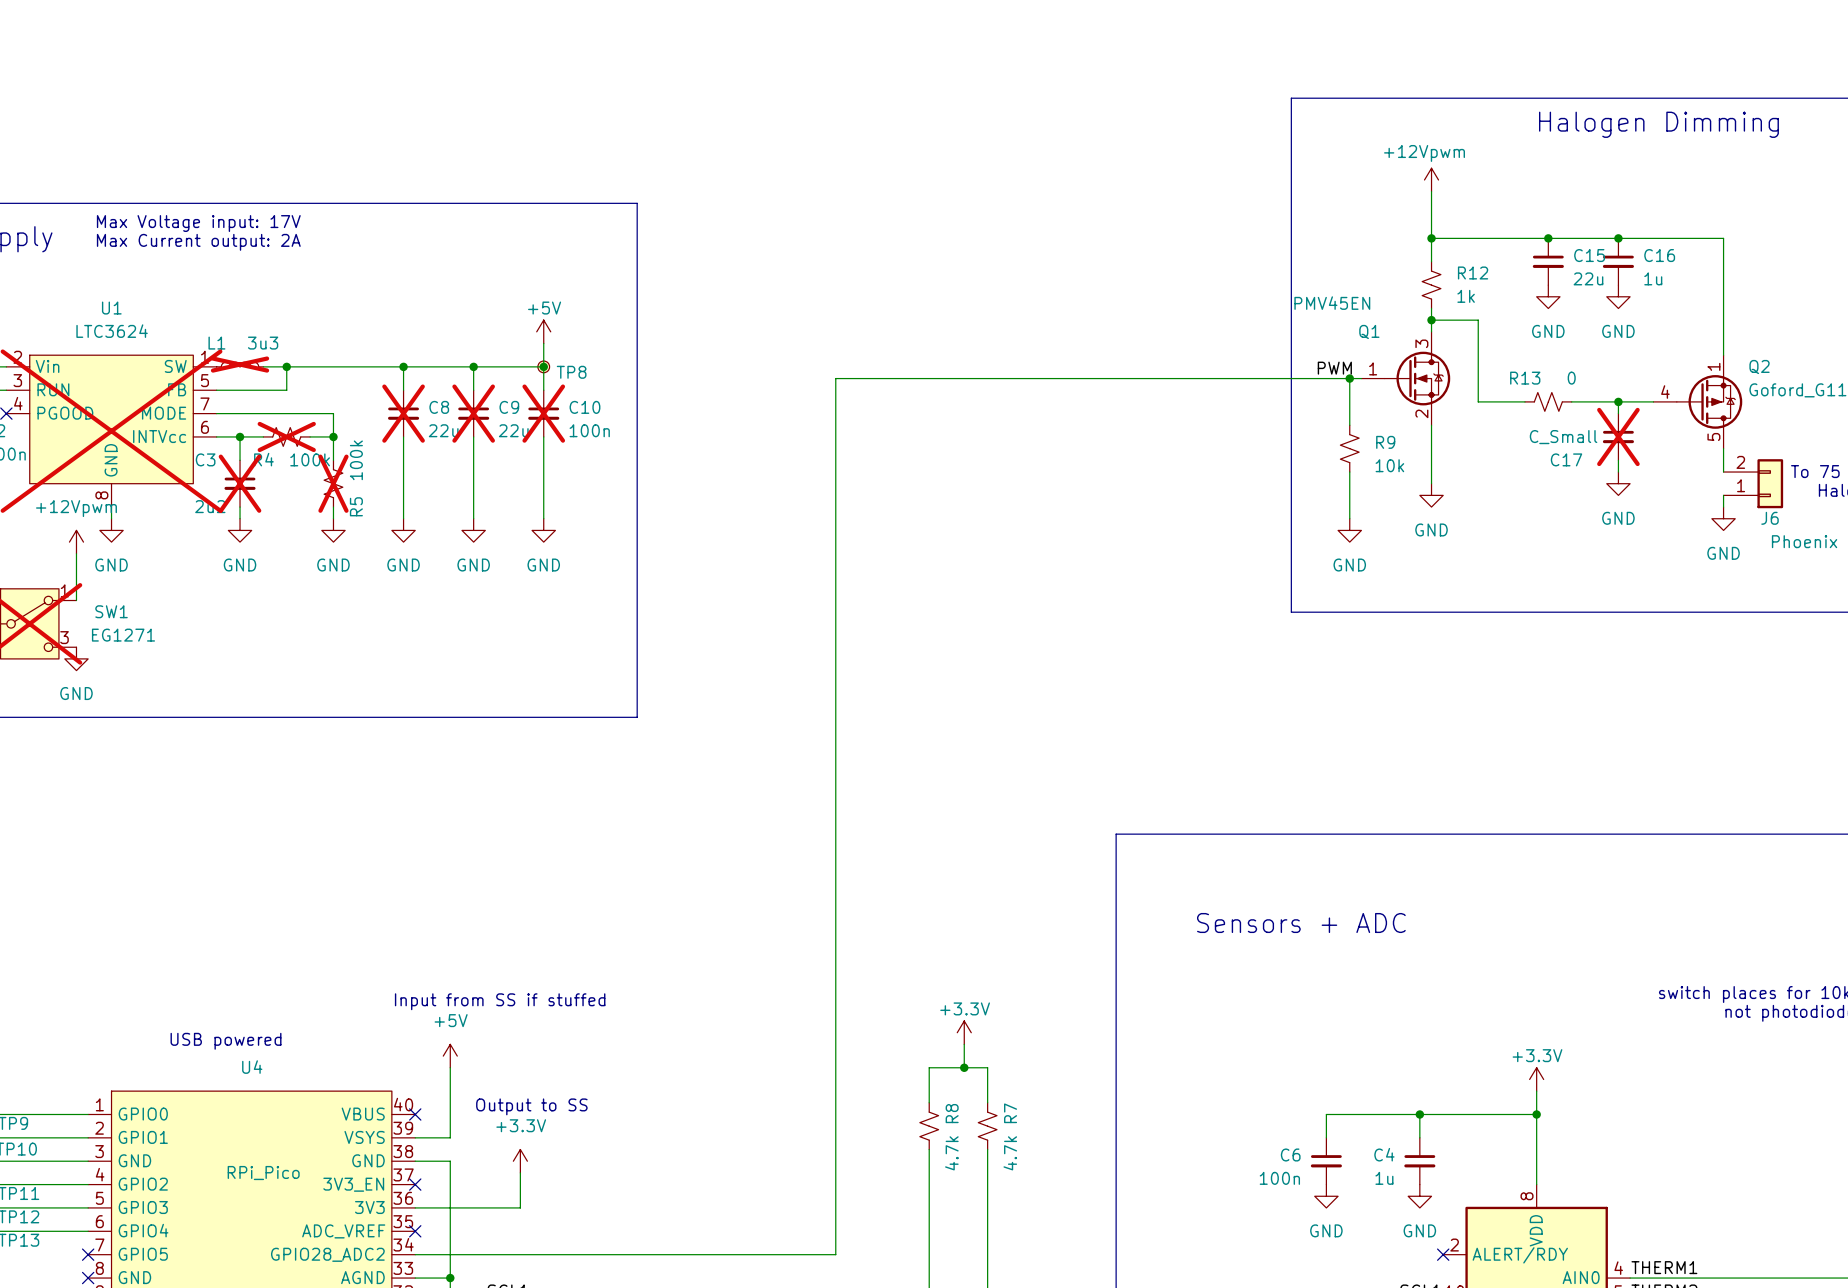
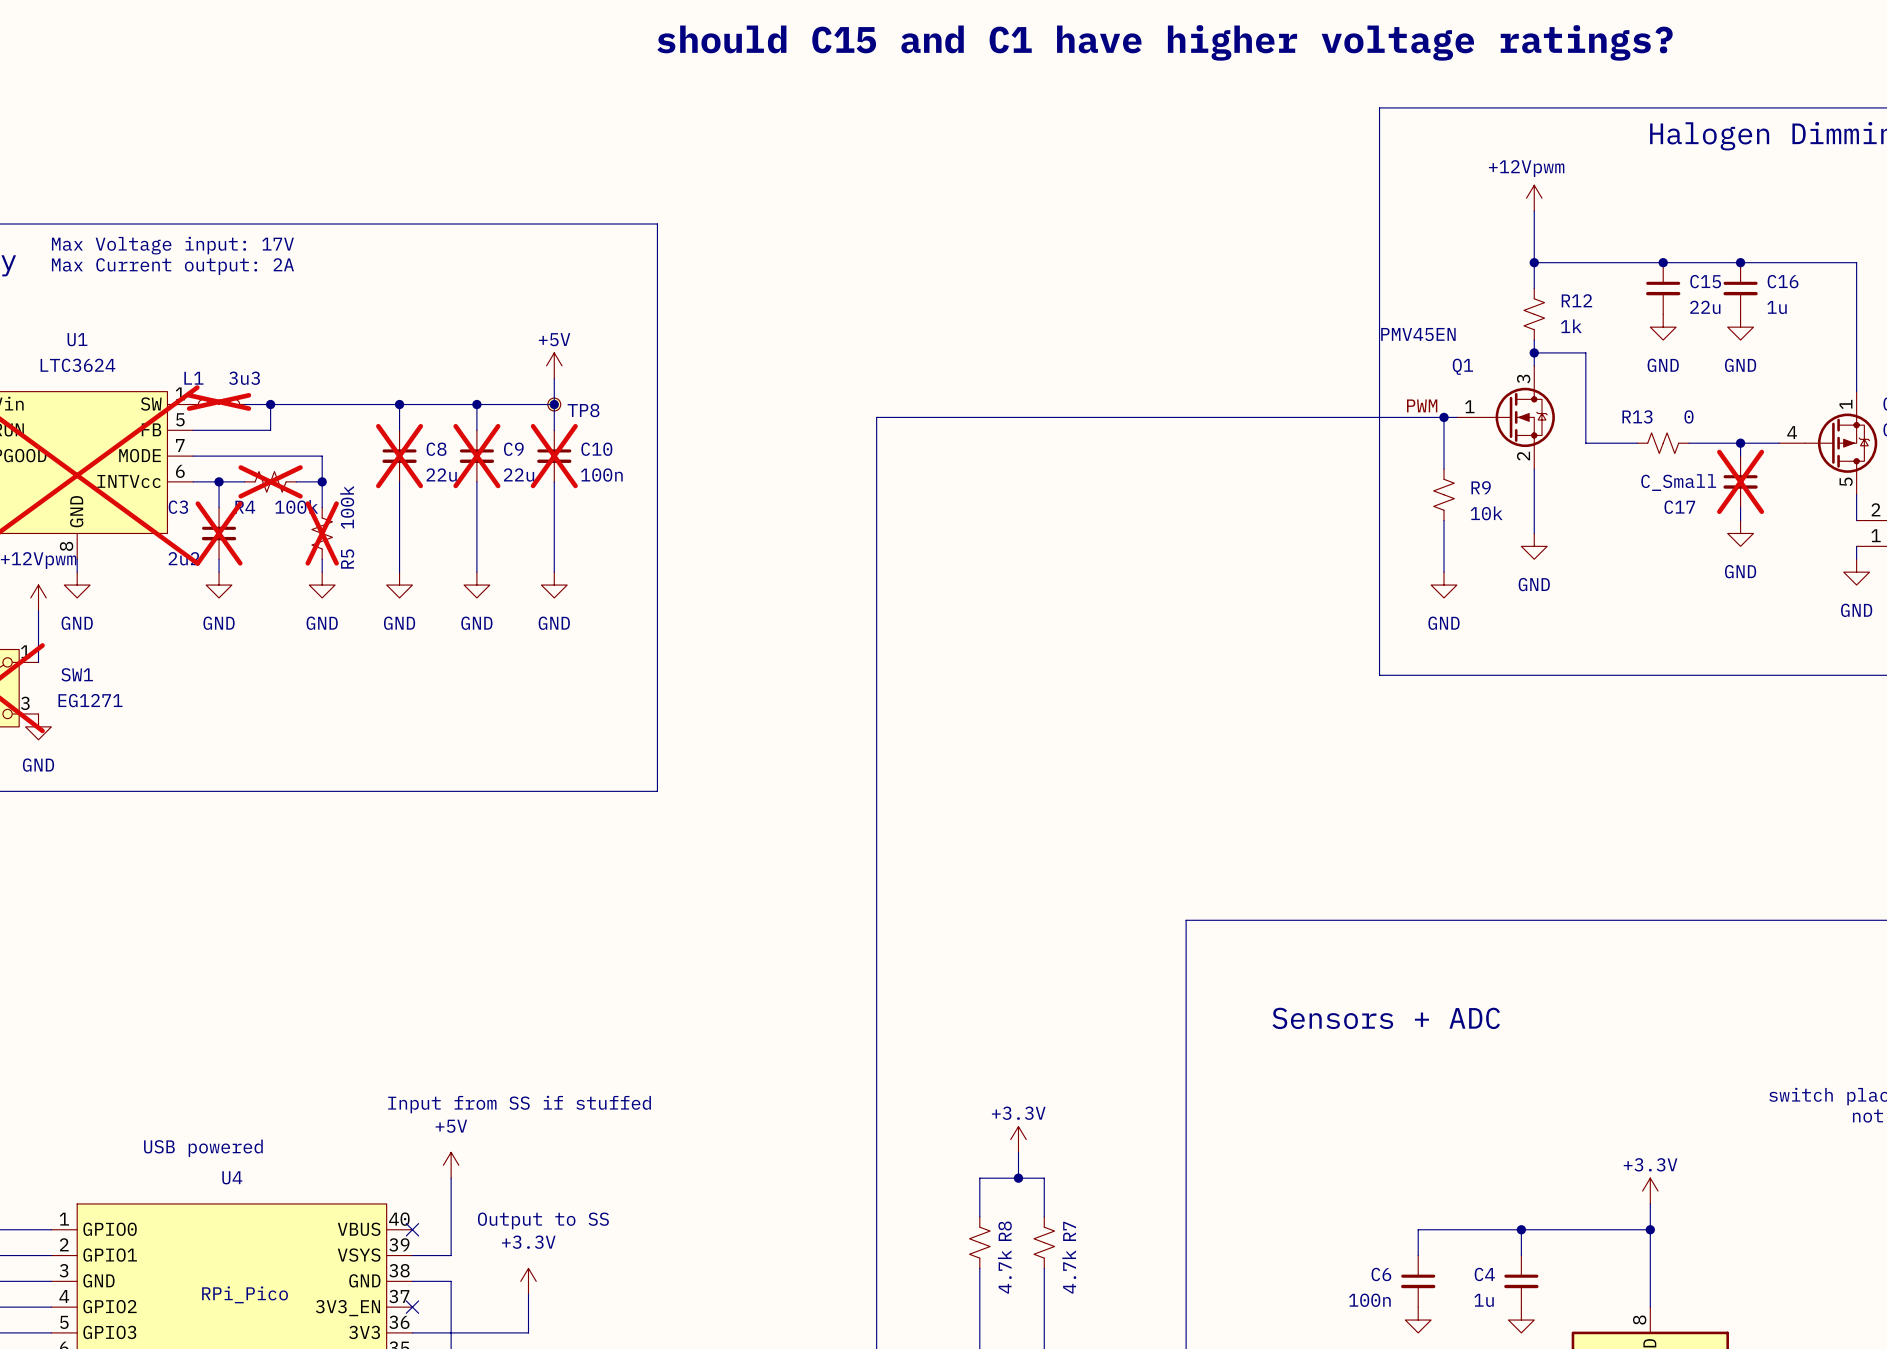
text: none -> should C15 and C1 have higher voltage ratings? (1165, 42)

